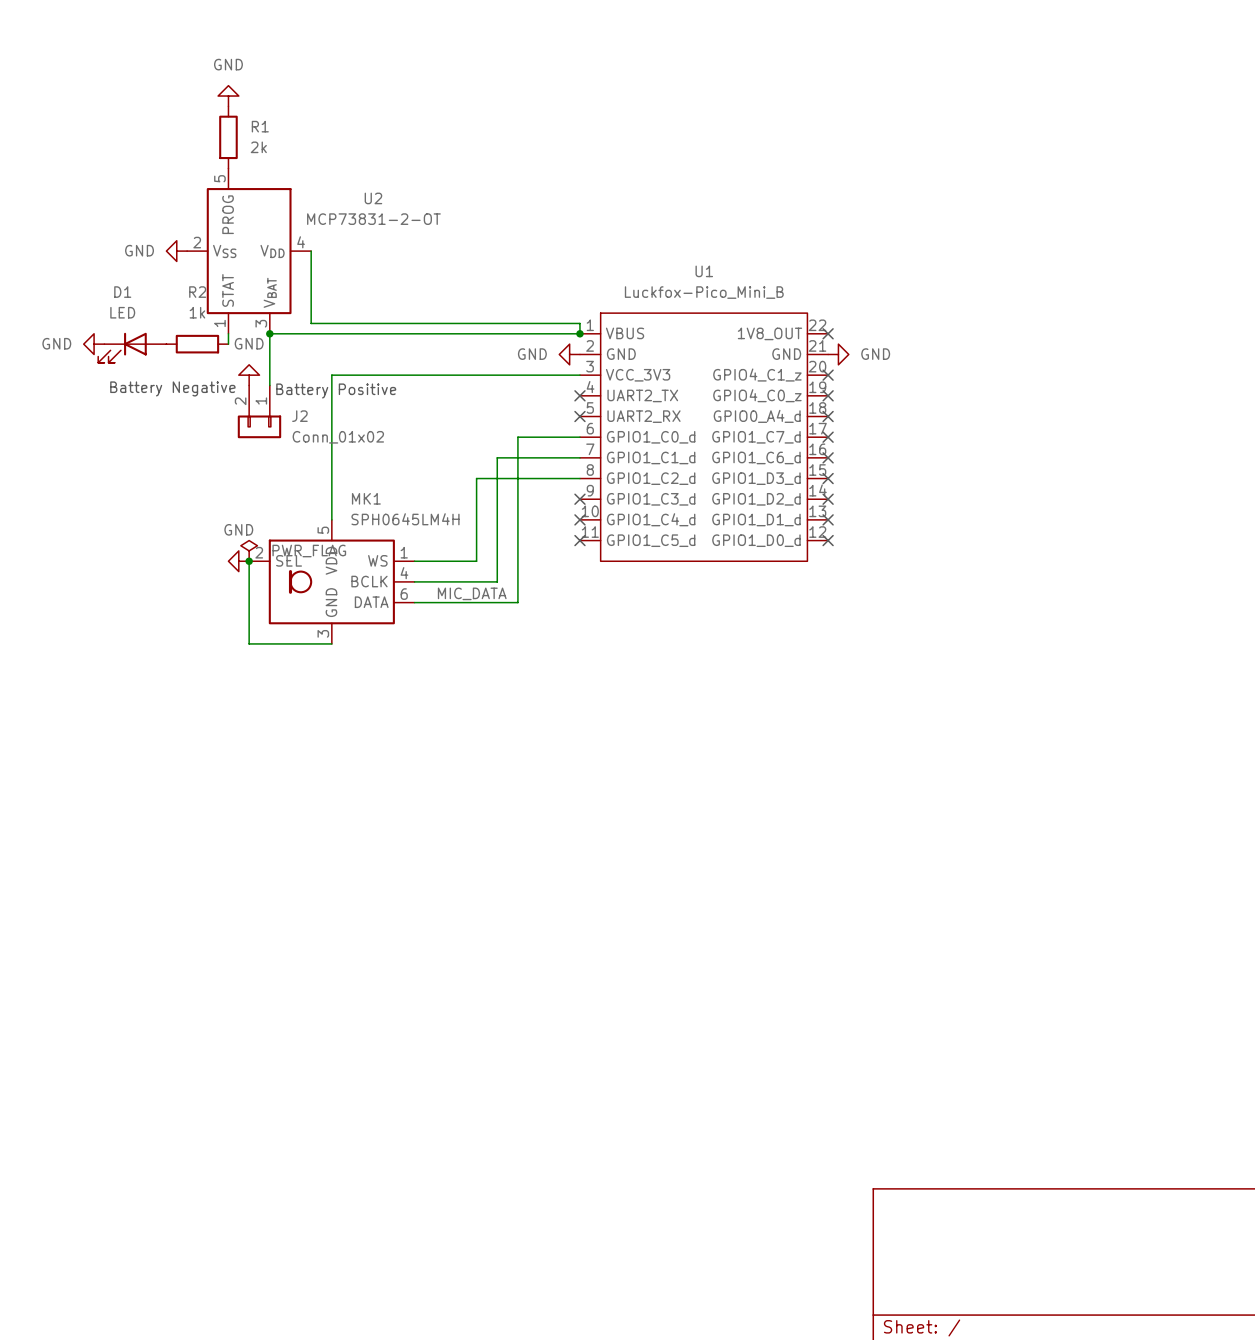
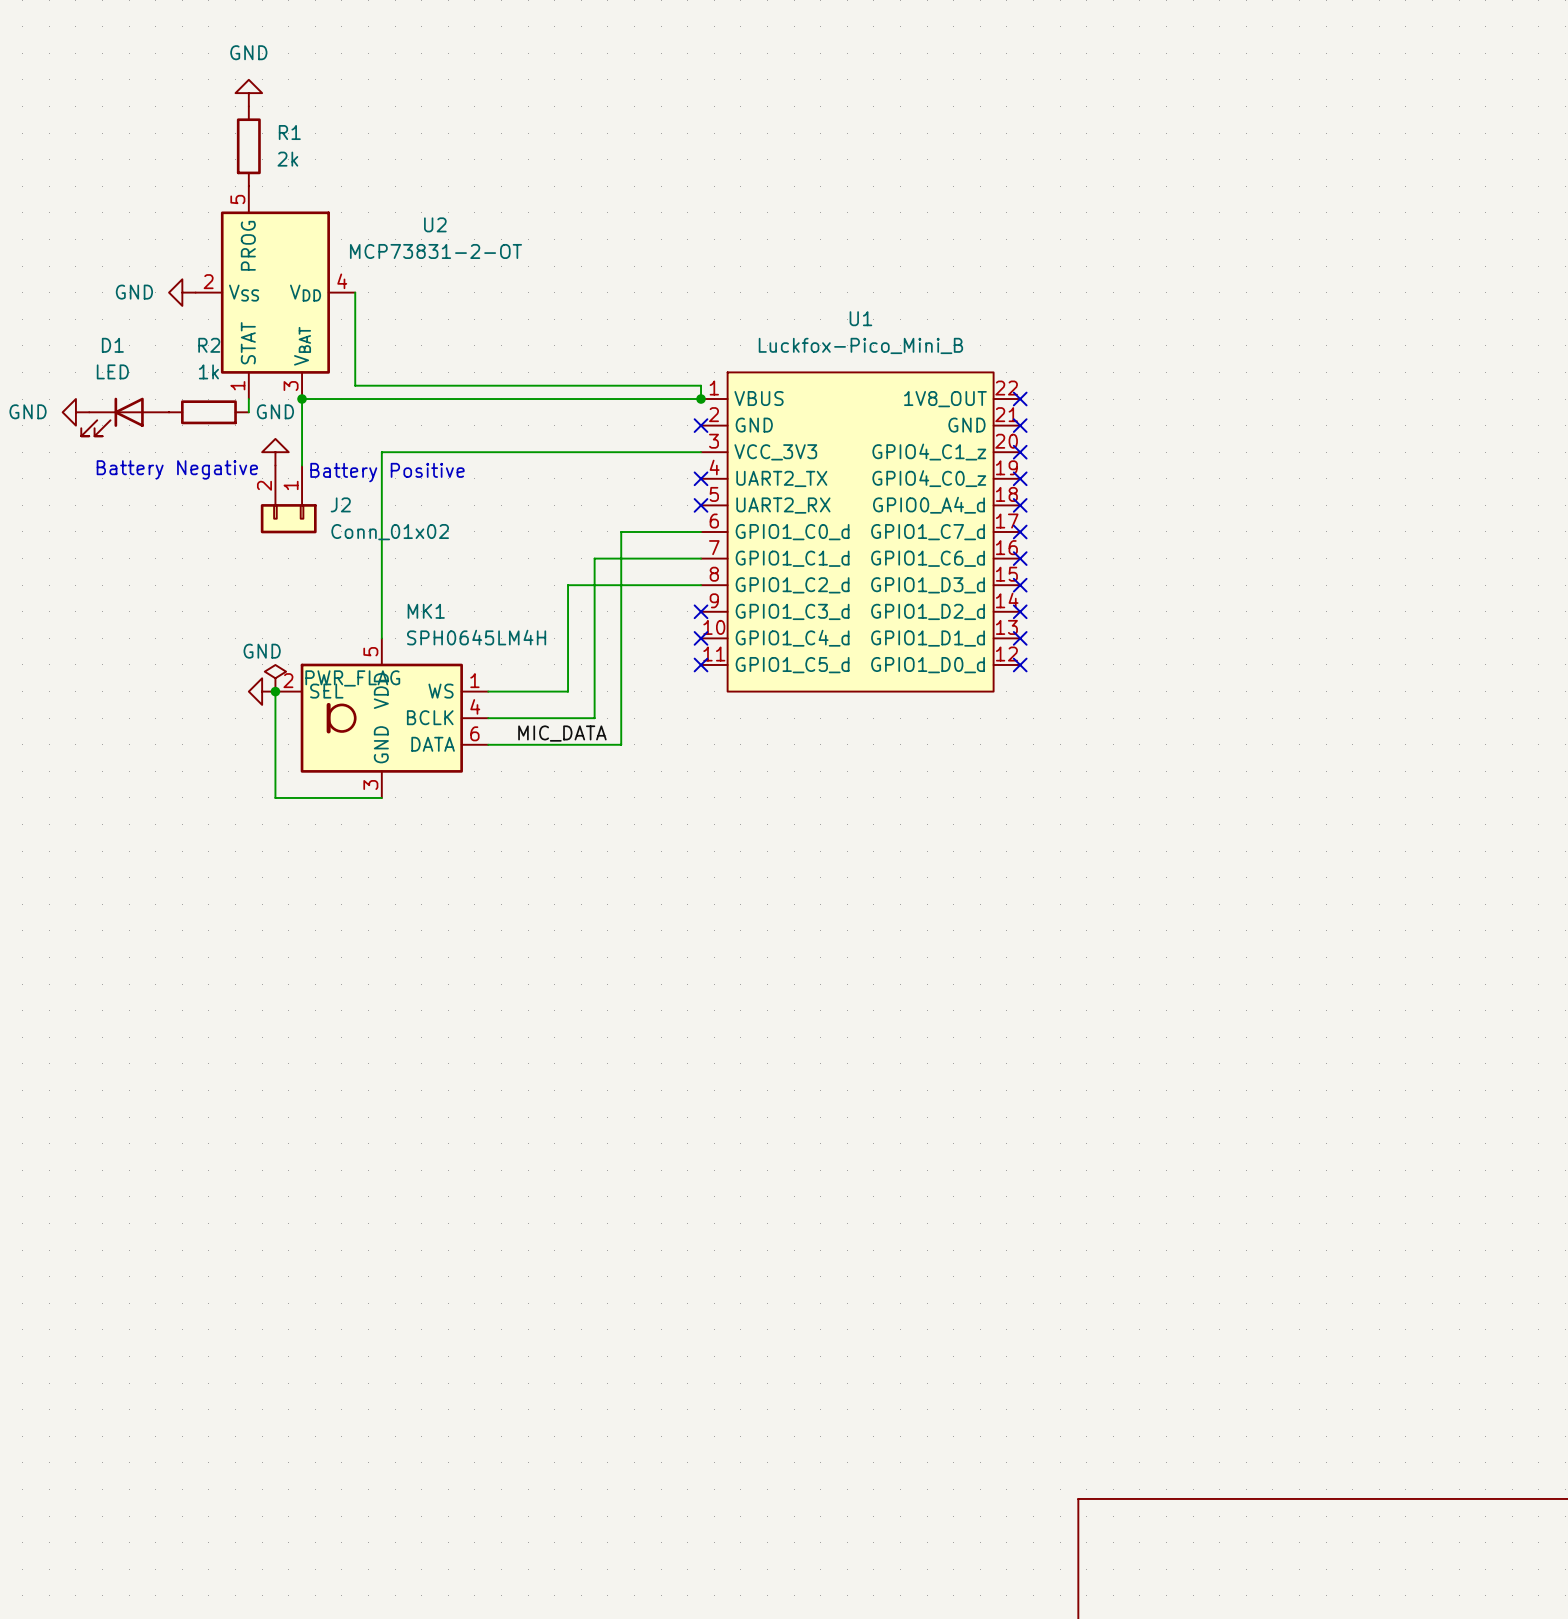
power symbol: GND (569, 354) -> none
no-connect mark: none -> (701, 425)
no-connect mark: none -> (1020, 425)
power symbol: GND (838, 354) -> none

